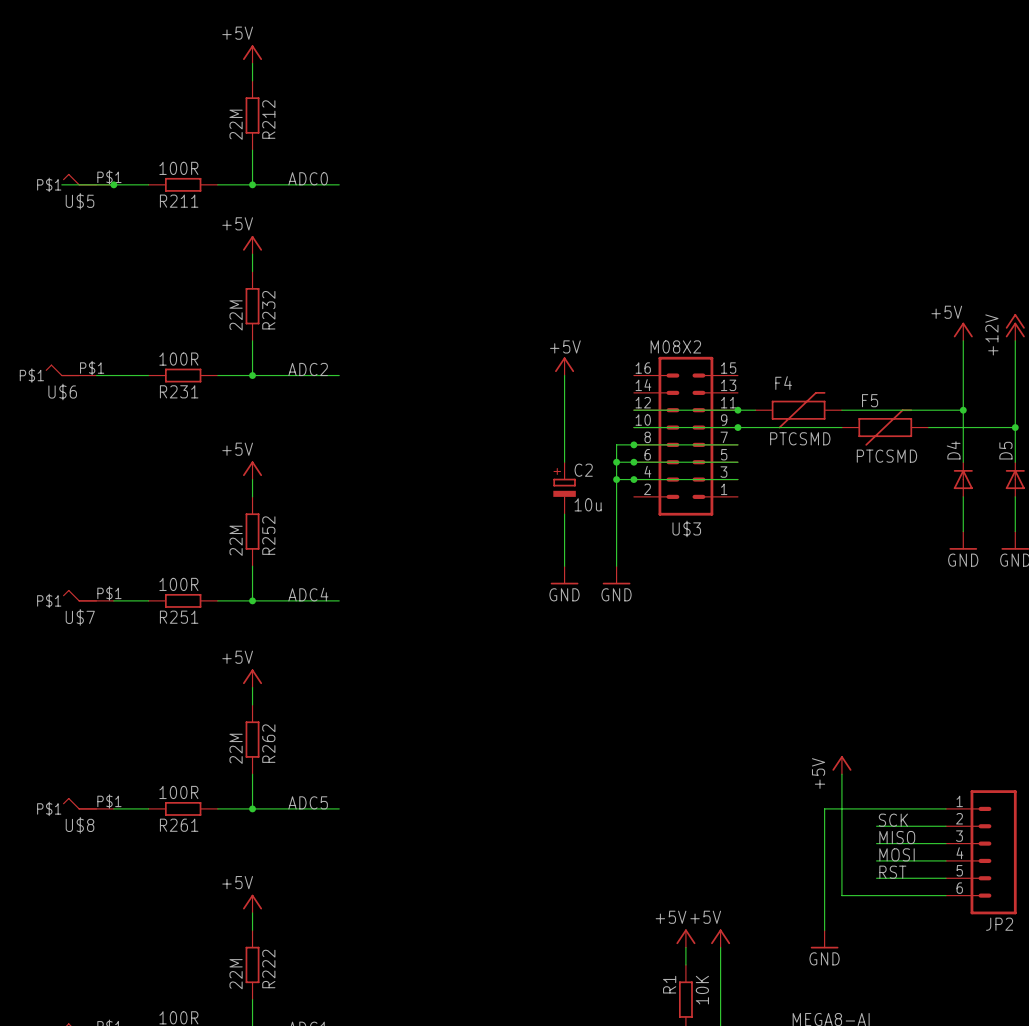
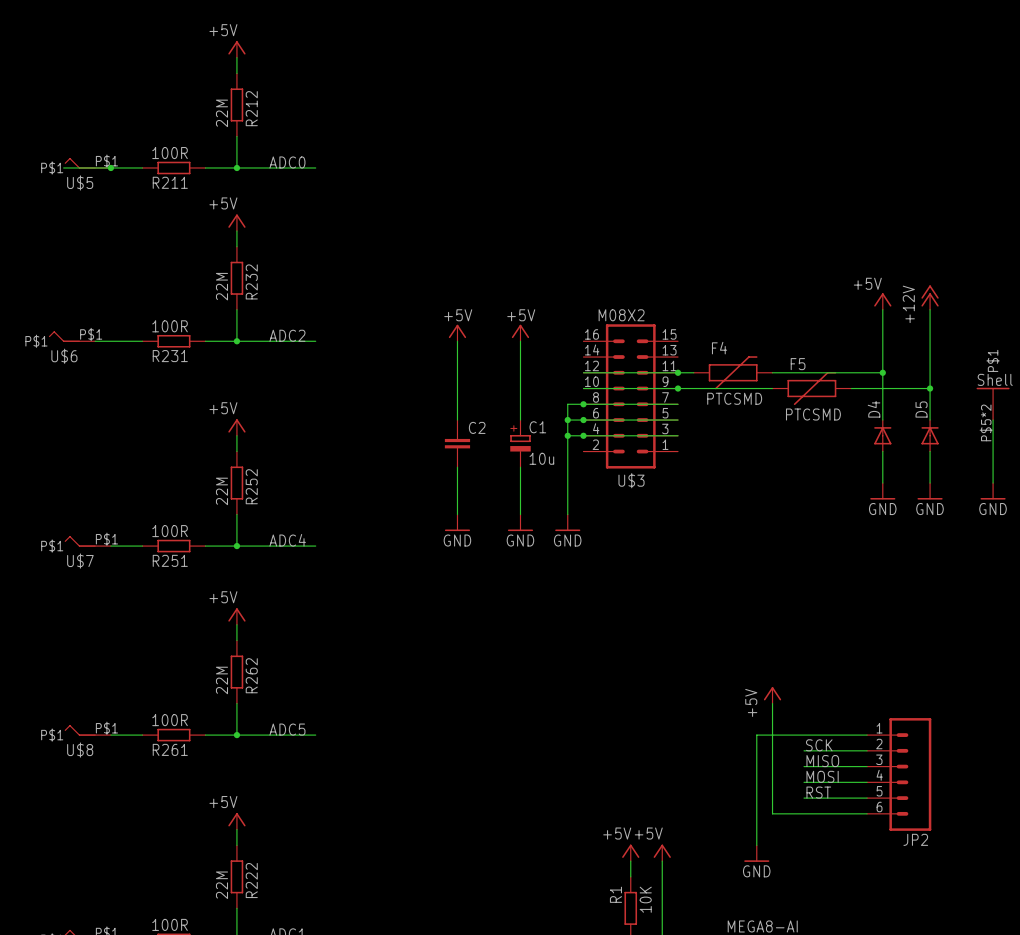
power symbol: none -> +5V (457, 333)
wire: none -> (457, 341) (457, 420)
C2 name: C2 (583, 470) -> C1 (537, 427)
C2: none -> (457, 443)
wire: none -> (457, 467) (457, 514)
power symbol: none -> GND (457, 522)

